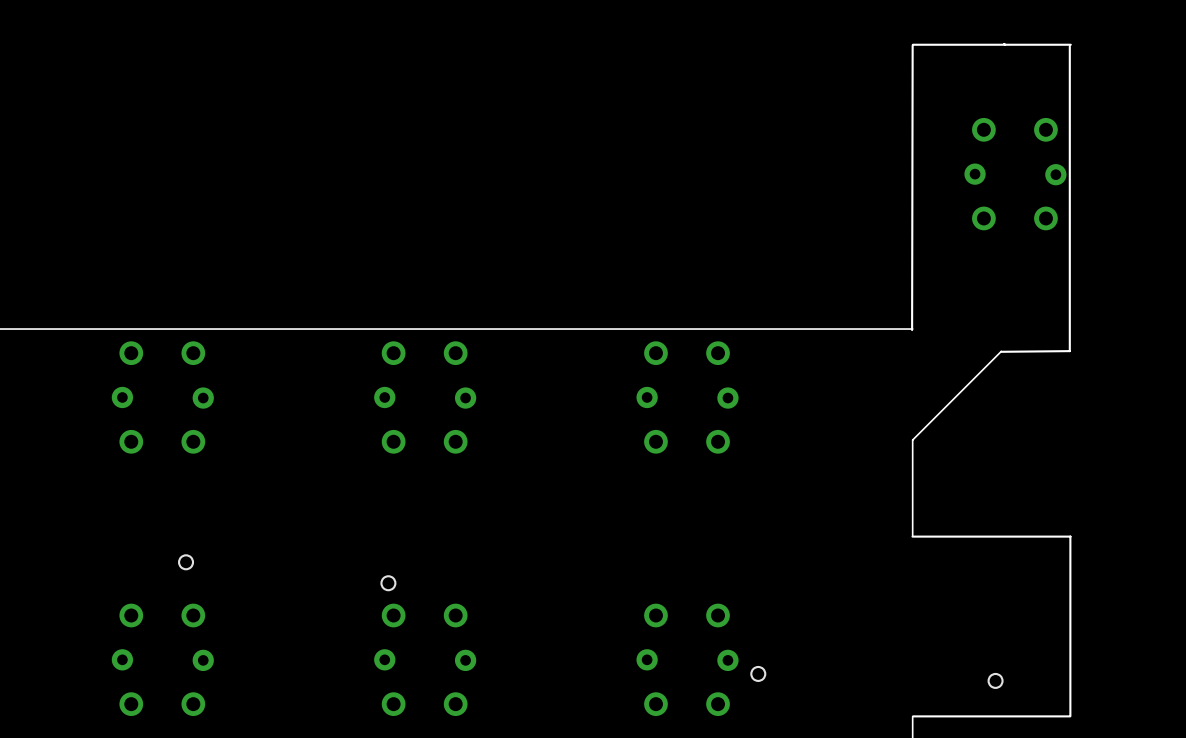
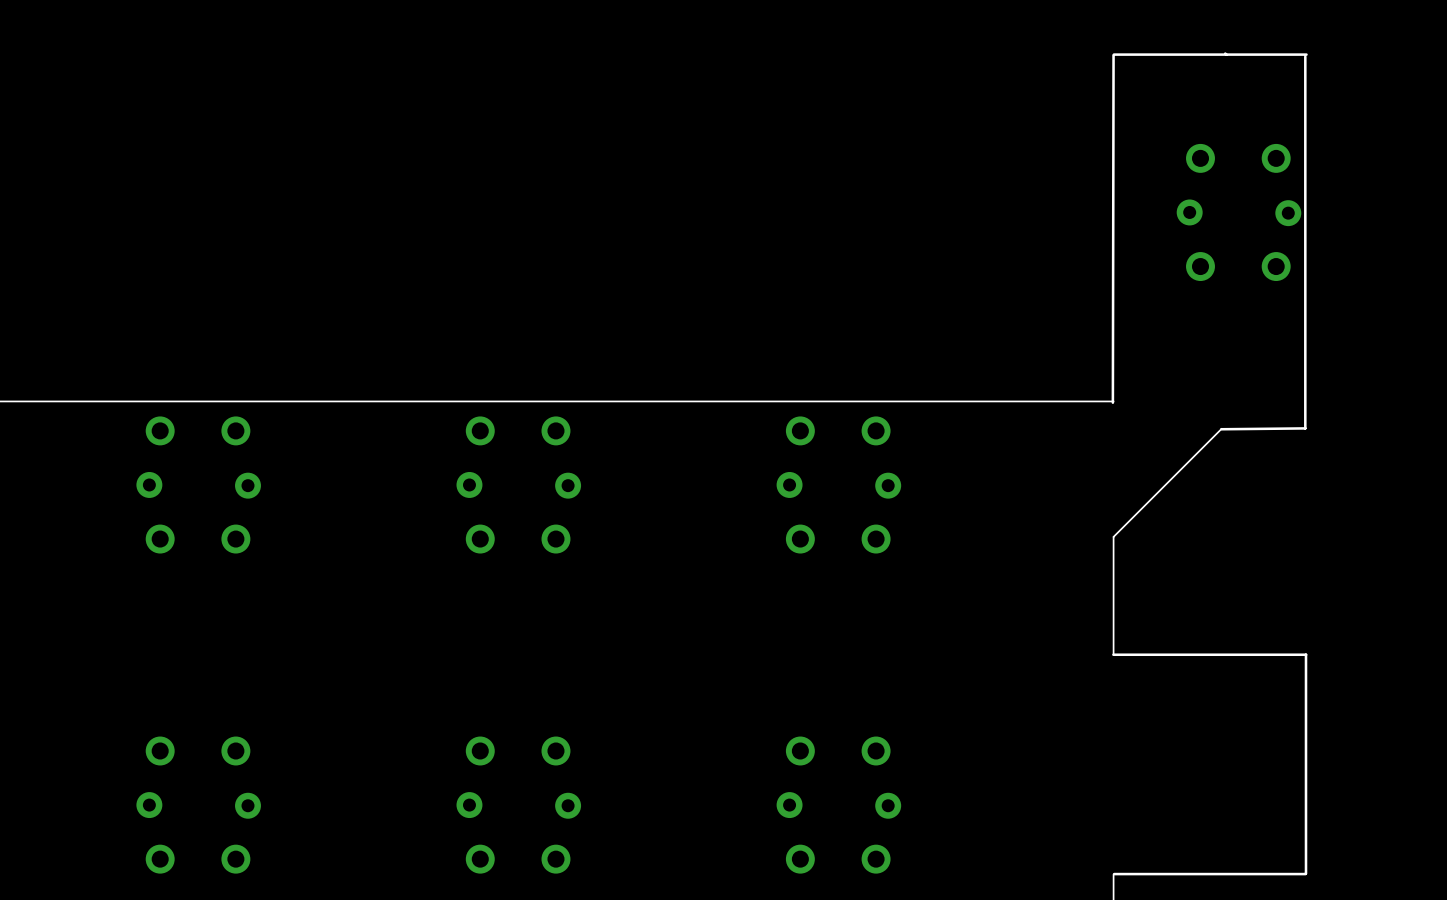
drawing: [178, 554, 195, 571] -> none
drawing: [380, 575, 397, 592] -> none
drawing: [750, 665, 767, 682] -> none
drawing: [987, 672, 1004, 689] -> none

